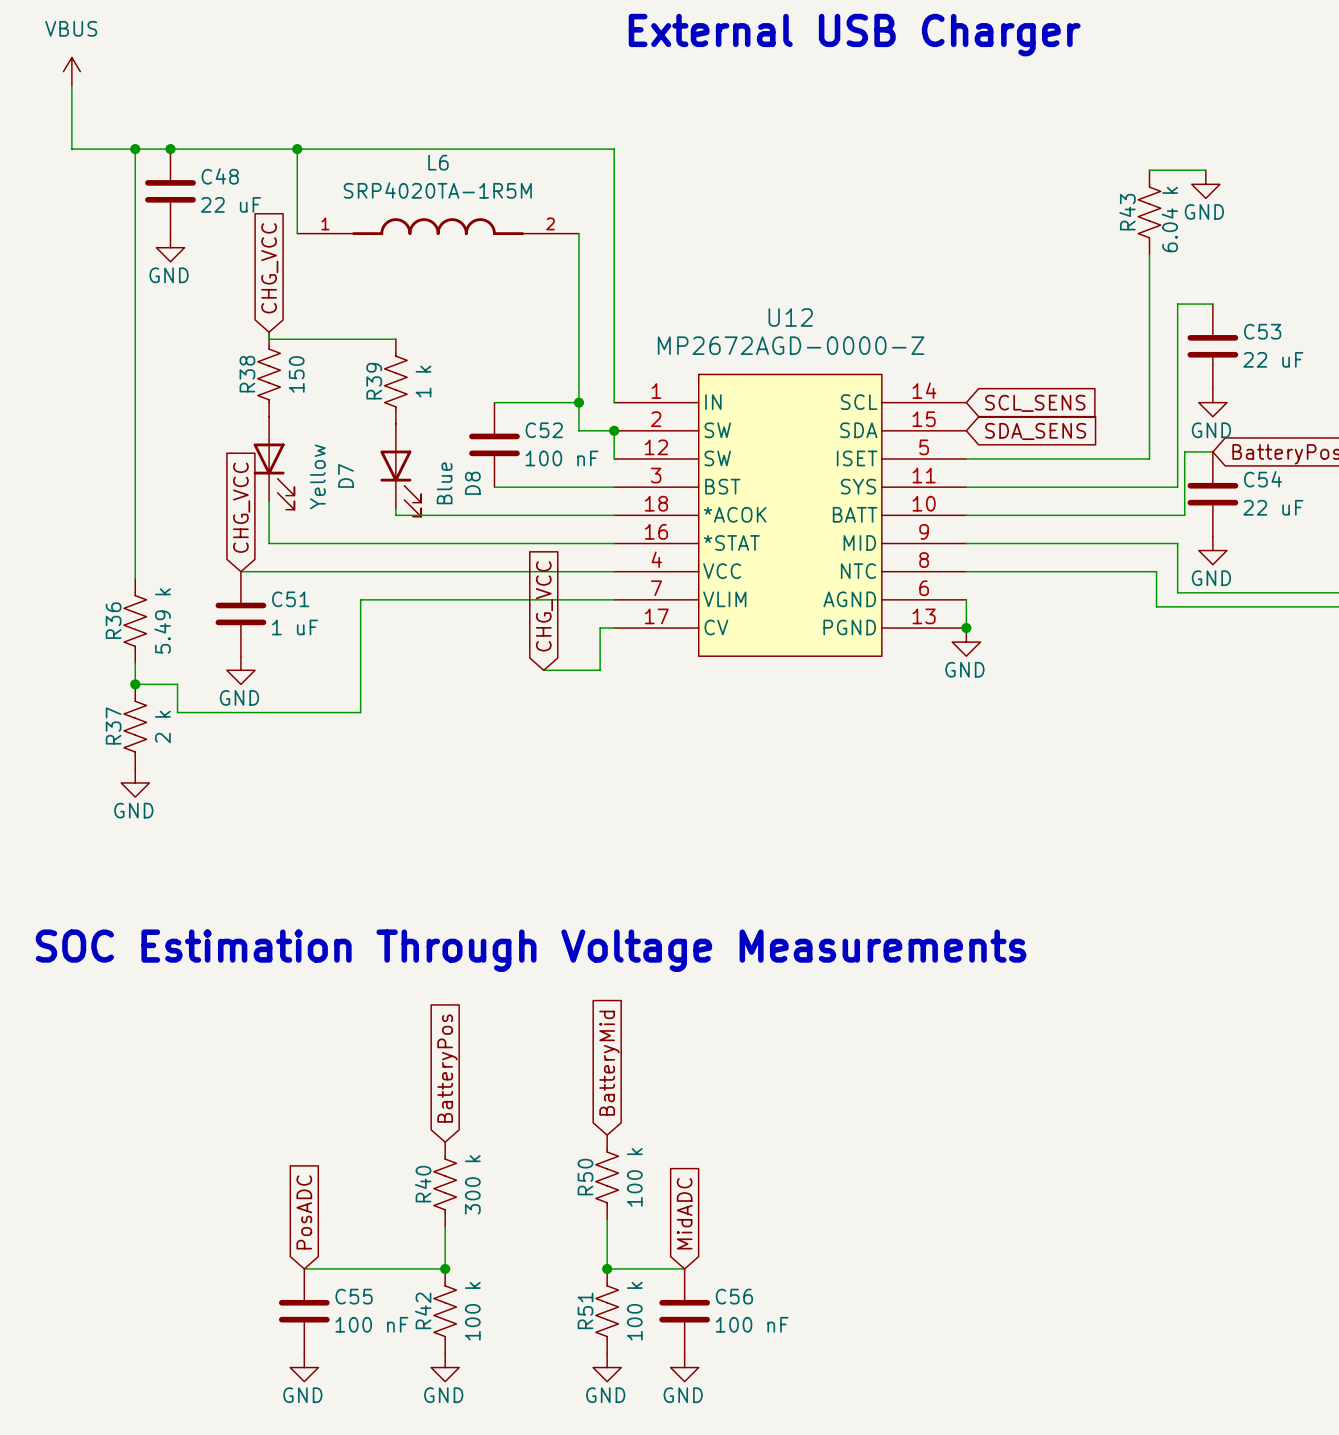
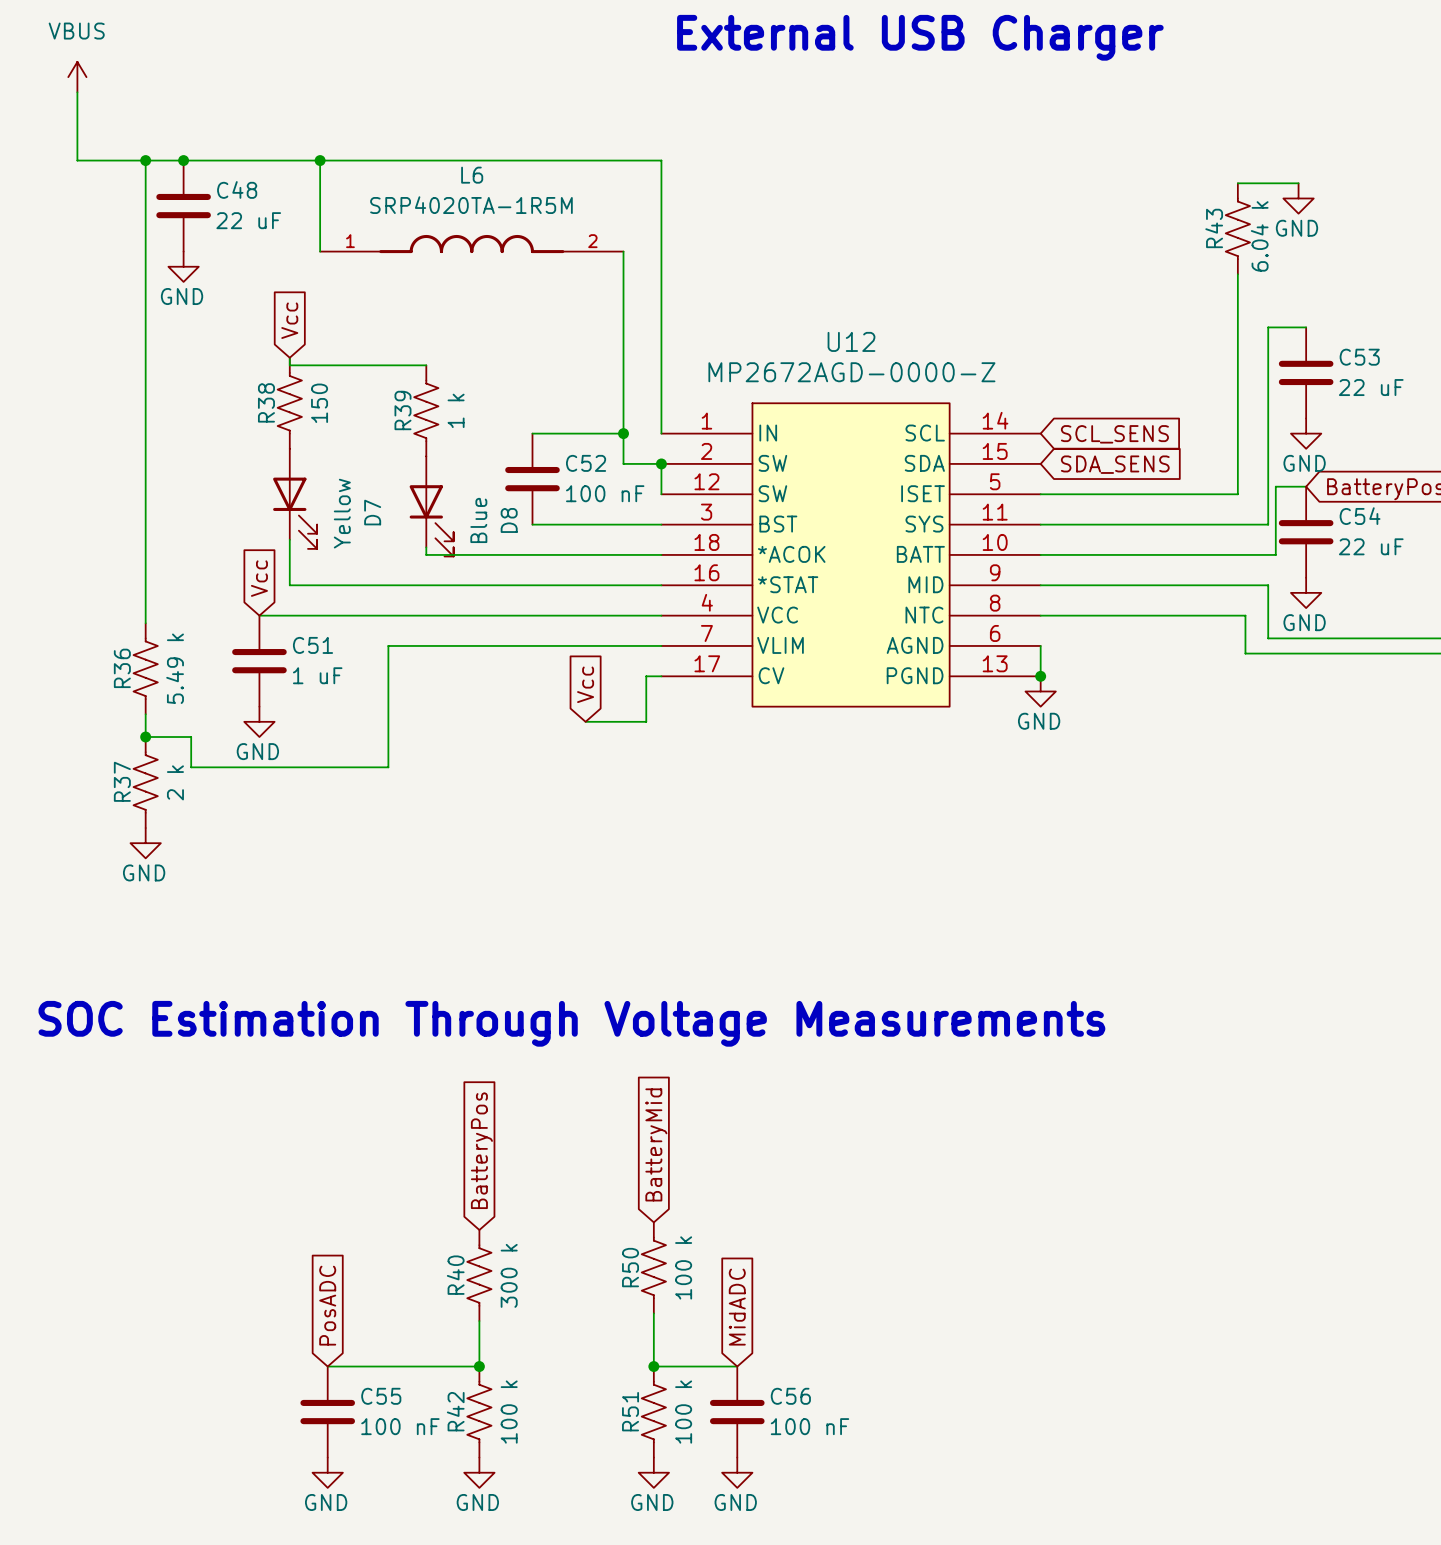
global label: CHG_VCC (269, 268) -> Vcc (289, 320)
global label: CHG_VCC (241, 507) -> Vcc (259, 578)
global label: CHG_VCC (544, 606) -> Vcc (585, 684)

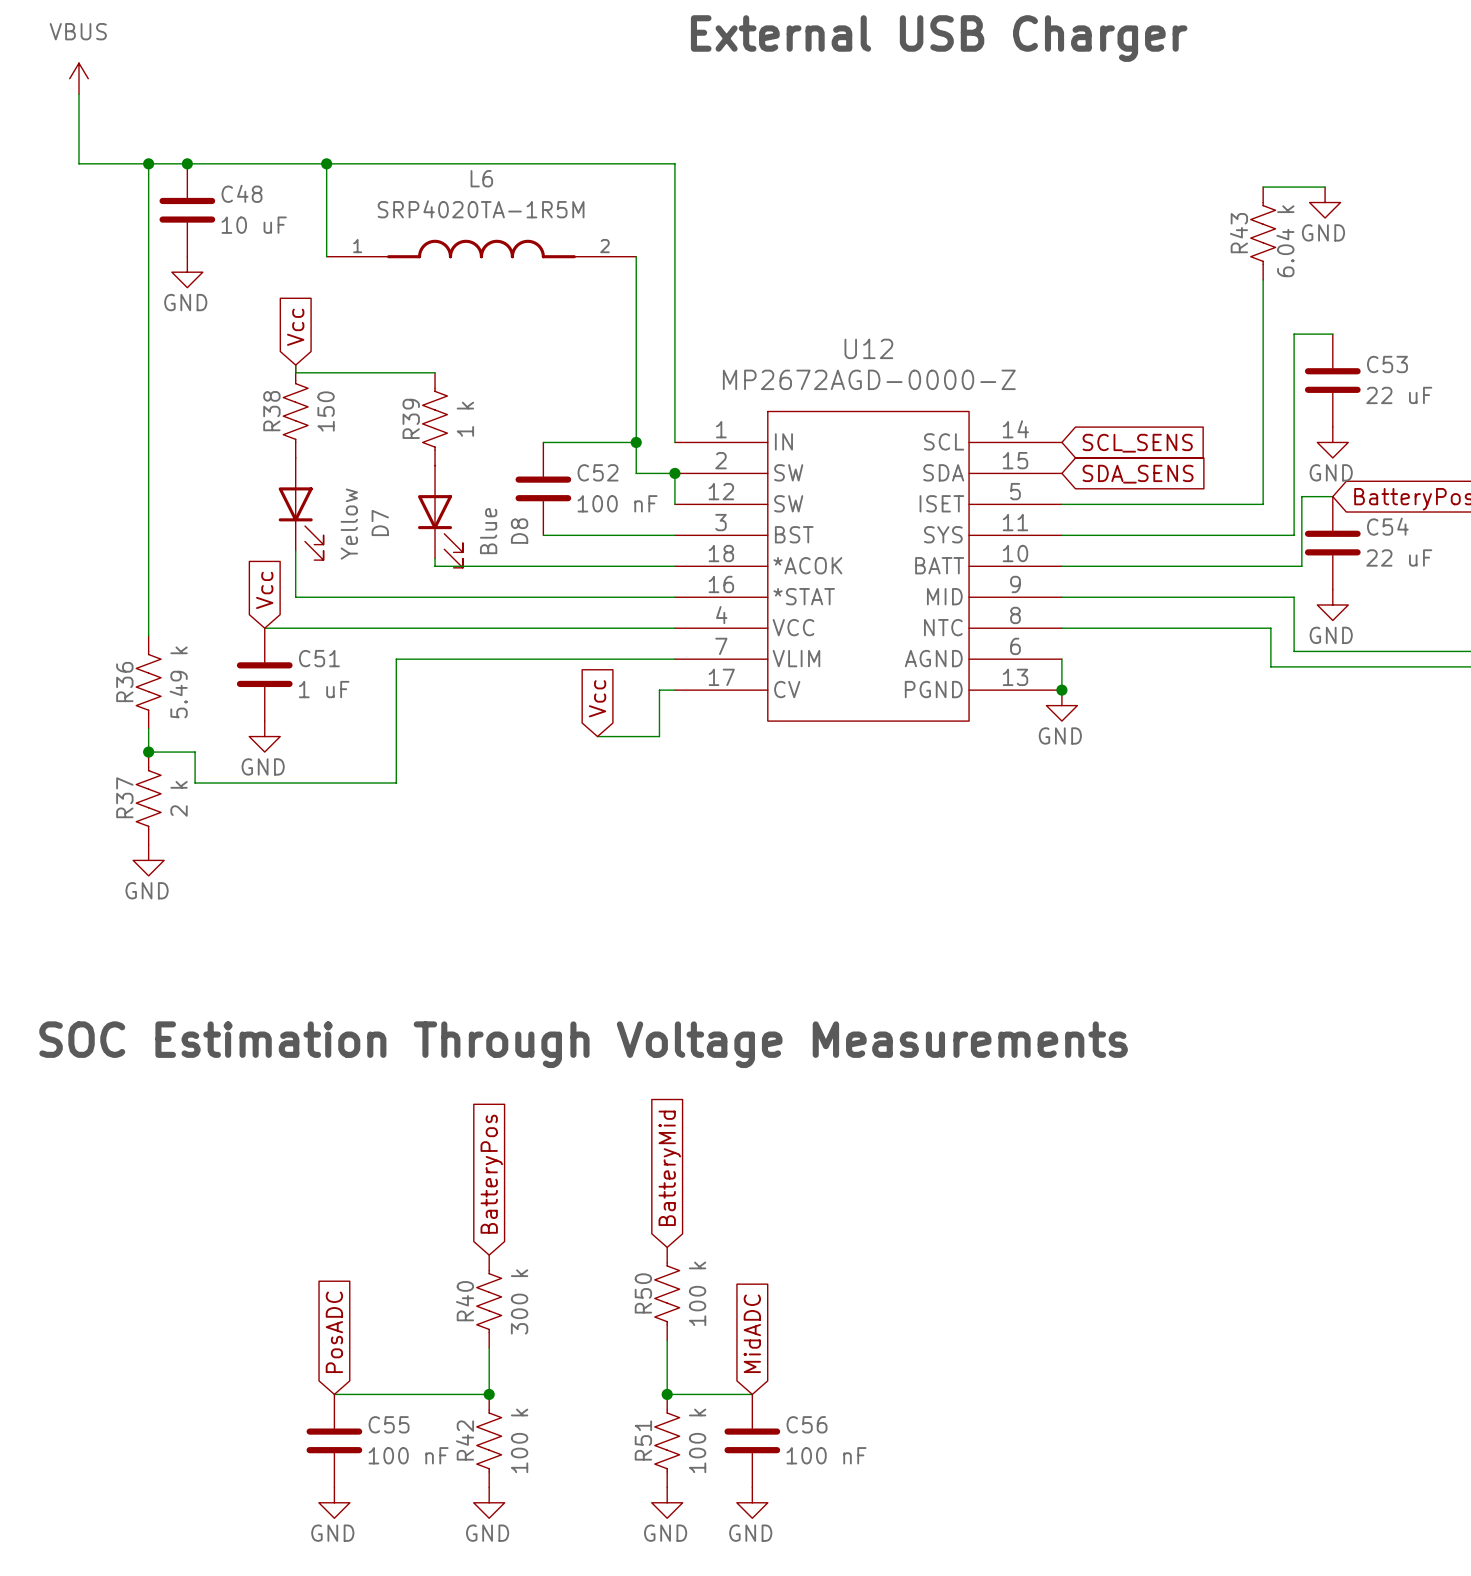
C48 value: 22 uF (248, 220) -> 10 uF (254, 225)

